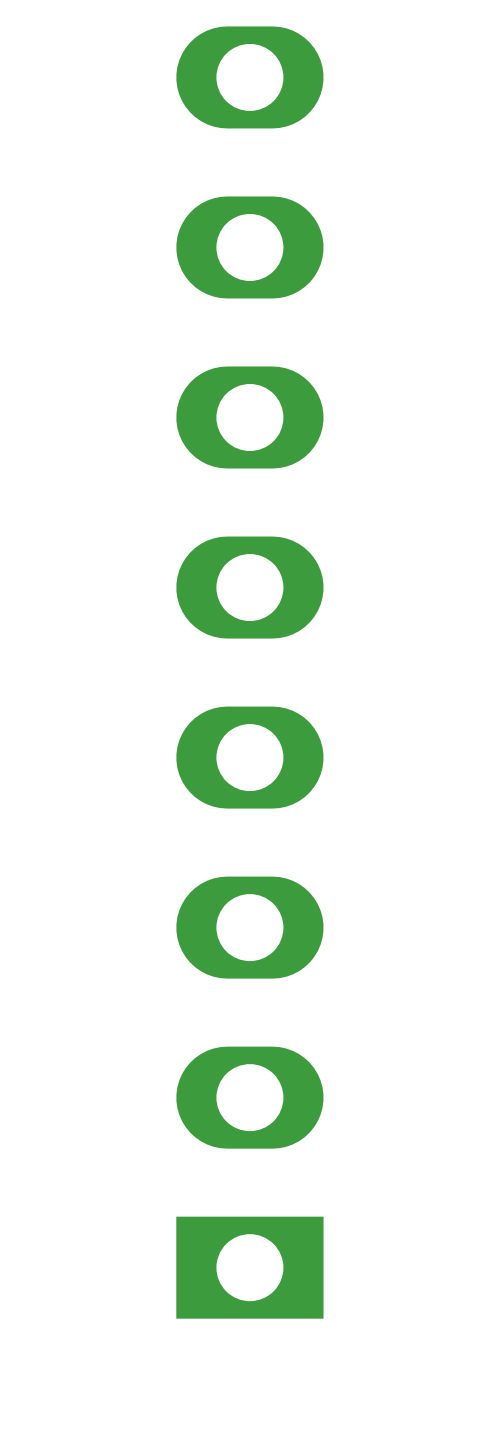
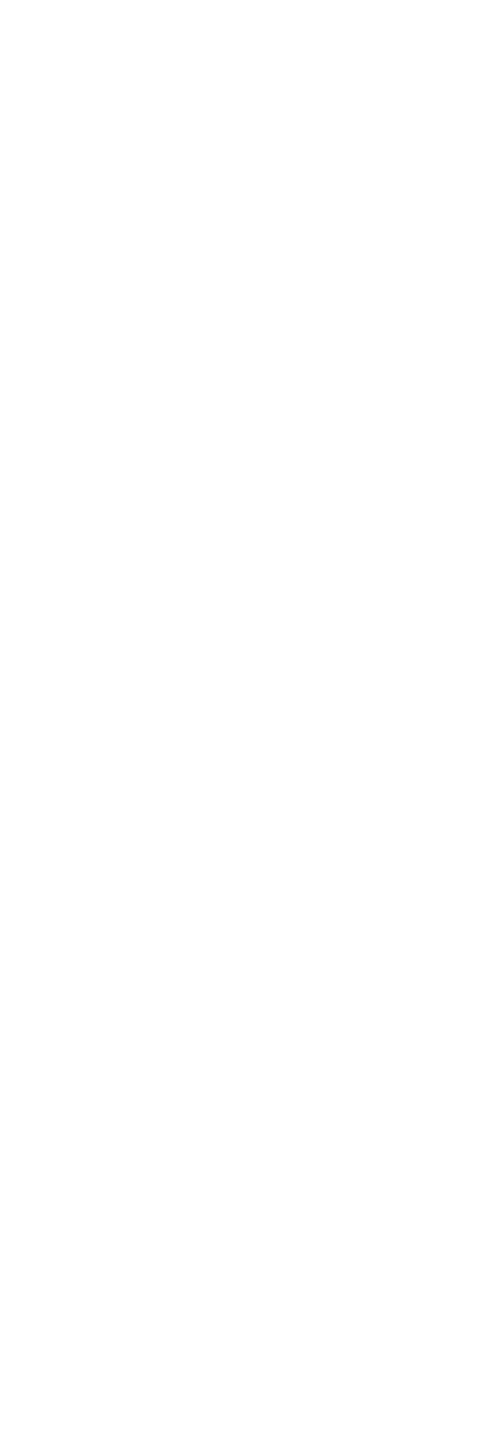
part: (249, 672) -> none

